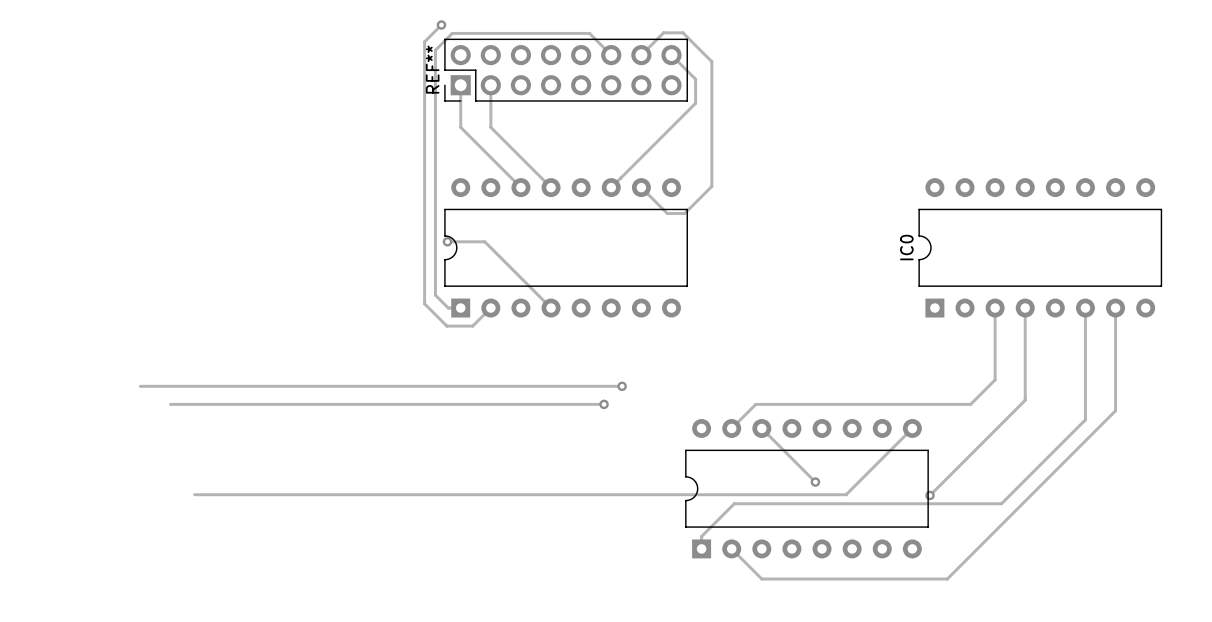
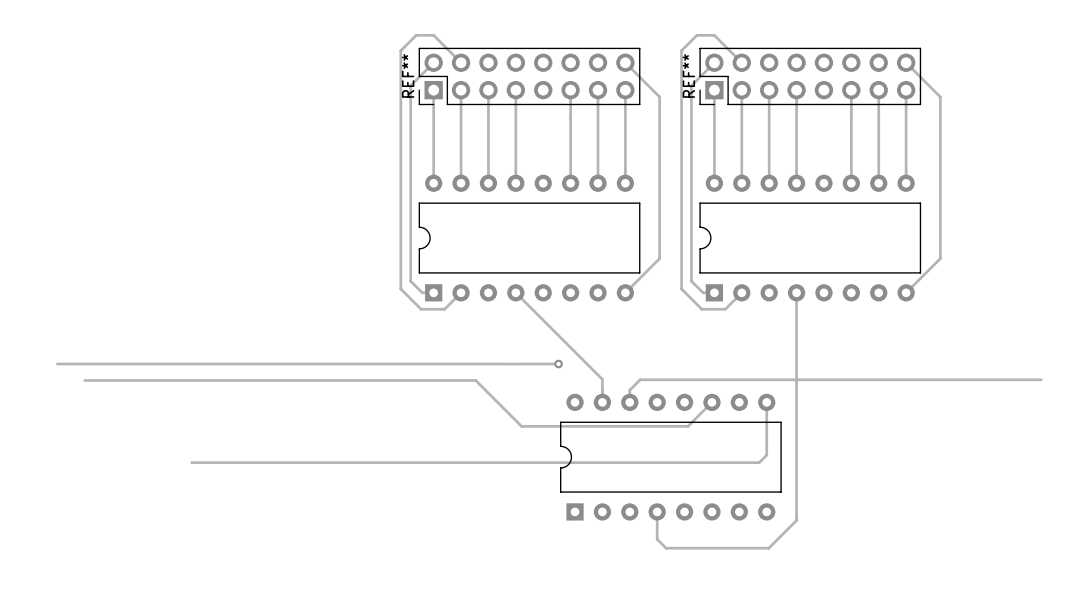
track: none -> (416, 35) (433, 35) (461, 62)
via: (441, 25) -> none
track: (611, 55) (589, 33) (452, 33) (435, 50) (435, 80) -> (433, 62) (410, 85)
track: (641, 55) (663, 32) (682, 32) (711, 61) (711, 186) (684, 213) (667, 213) (641, 187) -> (598, 90) (598, 183)
track: none -> (714, 62) (691, 85) (691, 281) (703, 292) (714, 292)
track: none -> (741, 62) (714, 35) (696, 35) (681, 50) (681, 288) (701, 309) (725, 309) (741, 292)
track: none -> (906, 62) (940, 96) (940, 258) (906, 292)
REF**: none -> (810, 76)
track: (695, 79) (695, 103) (611, 187) -> (570, 90) (570, 183)
track: none -> (647, 84) (659, 96) (659, 258) (625, 292)
track: none -> (488, 90) (488, 183)
track: none -> (515, 90) (515, 183)
track: none -> (625, 90) (625, 183)
track: none -> (714, 90) (714, 183)
track: none -> (741, 90) (741, 183)
track: none -> (769, 90) (769, 183)
track: none -> (796, 90) (796, 183)
track: none -> (851, 90) (851, 183)
track: none -> (878, 90) (878, 183)
track: none -> (906, 90) (906, 183)
track: (460, 127) (520, 187) -> (433, 128) (433, 183)
track: (490, 127) (551, 187) -> (461, 128) (461, 183)
track: (447, 241) (484, 241) (551, 308) -> (602, 402) (602, 379) (515, 292)
via: (447, 241) -> none
part: none -> (810, 238)
IC0: (1040, 247) -> none
track: none -> (796, 292) (796, 520) (768, 548) (666, 548) (657, 539) (657, 511)
track: (995, 308) (995, 379) (970, 404) (755, 404) (731, 428) -> none
track: (1025, 308) (1025, 400) (930, 495) -> none
track: (1085, 308) (1085, 419) (1001, 503) (734, 503) (701, 536) (701, 548) -> none
track: (1115, 308) (1115, 410) (947, 579) (761, 579) (731, 548) -> none
track: none -> (57, 364) (142, 364)
track: (598, 386) (622, 386) -> none
via: none -> (558, 364)
via: (622, 386) -> none
track: none -> (1041, 379) (640, 379) (629, 390) (629, 402)
track: none -> (84, 380) (169, 380)
track: (506, 404) (604, 404) -> (475, 380) (521, 426) (687, 426) (711, 402)
via: (604, 404) -> none
track: (761, 428) (816, 482) -> none
track: (912, 428) (846, 494) (818, 494) -> (766, 402) (766, 455) (759, 462)
via: (815, 482) -> none
part position: (806, 488) -> (670, 457)
via: (930, 495) -> none

